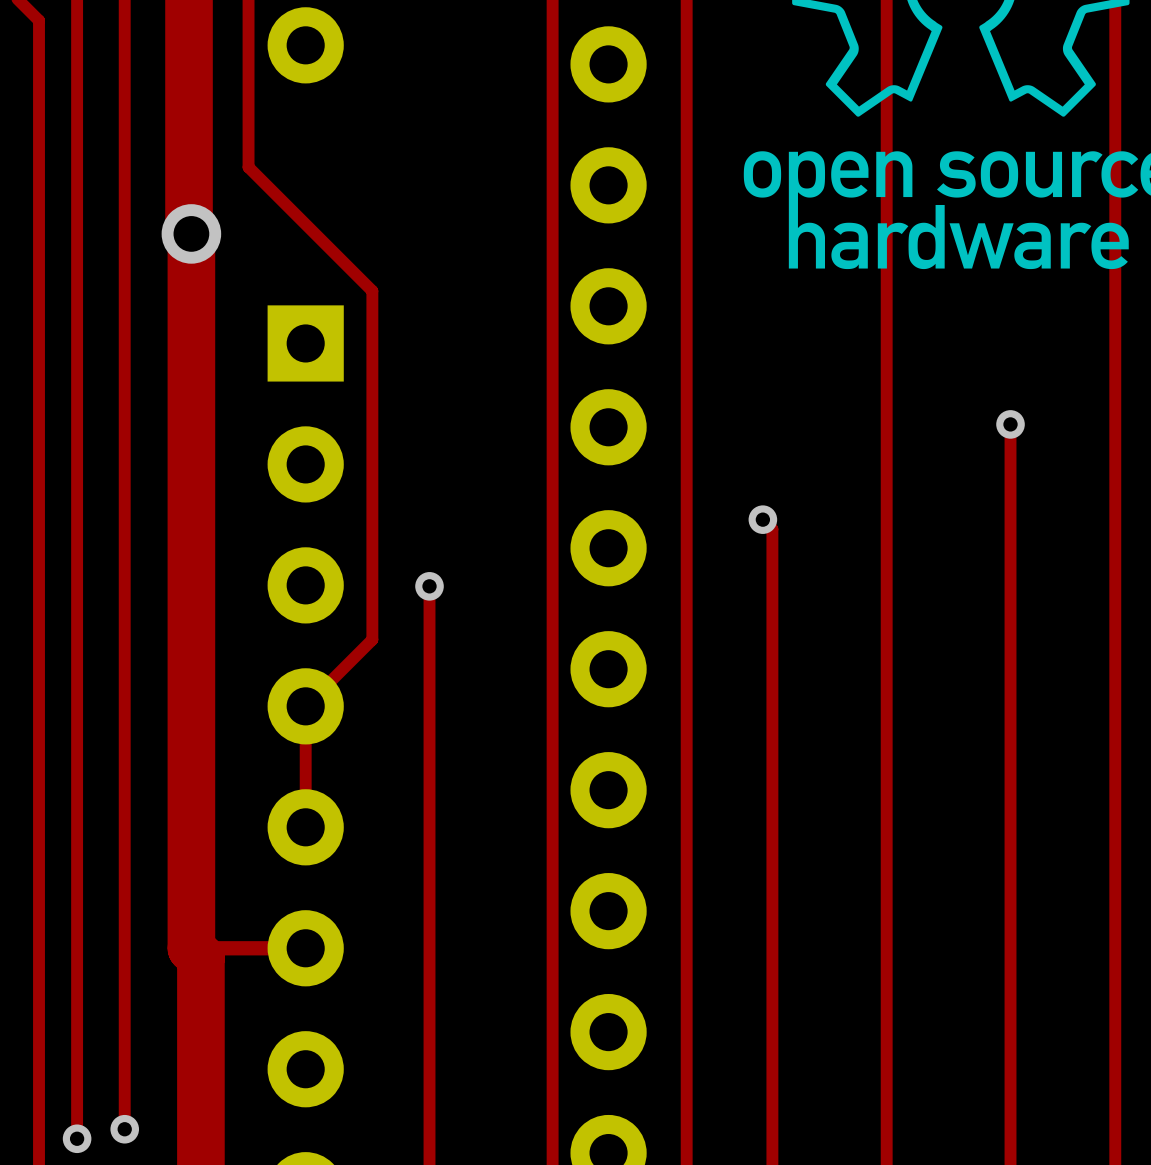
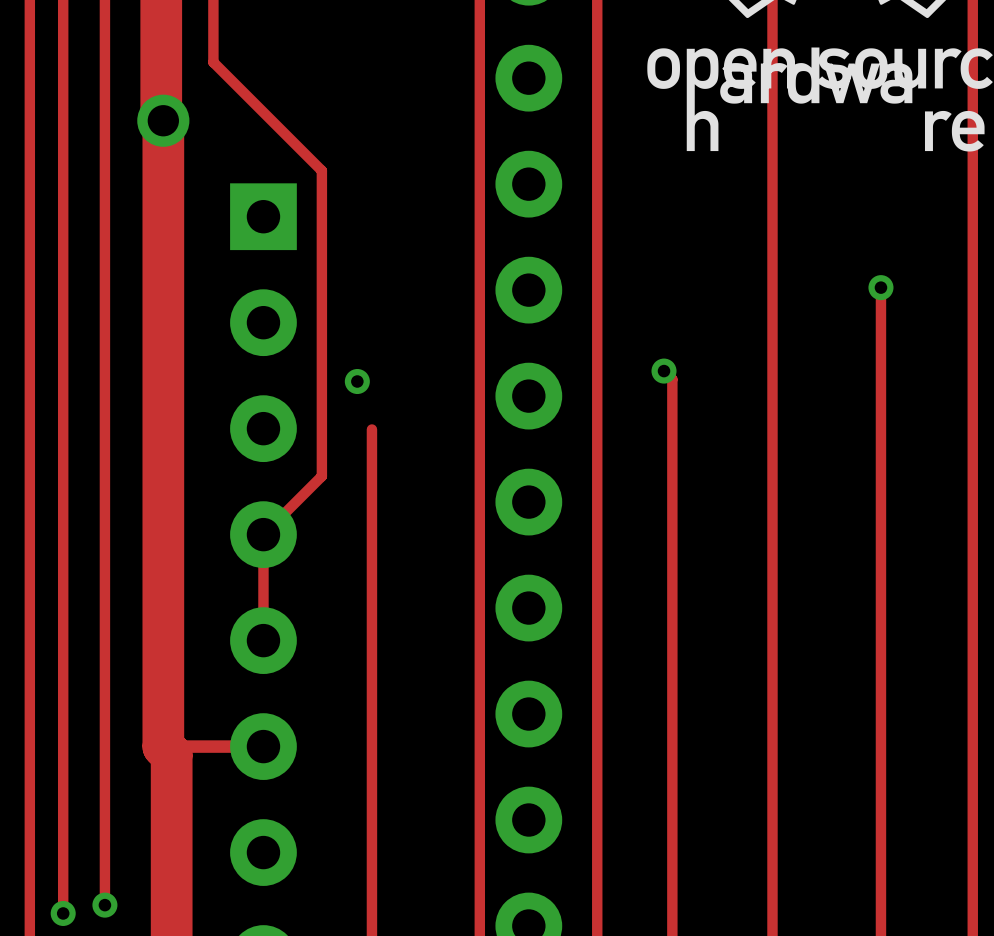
drawing position: (926, 237) -> (803, 75)
drawing position: (849, 245) -> (736, 83)
drawing position: (893, 245) -> (774, 83)
drawing position: (981, 245) -> (851, 83)
drawing position: (1032, 245) -> (896, 83)
via position: (429, 586) -> (357, 381)

